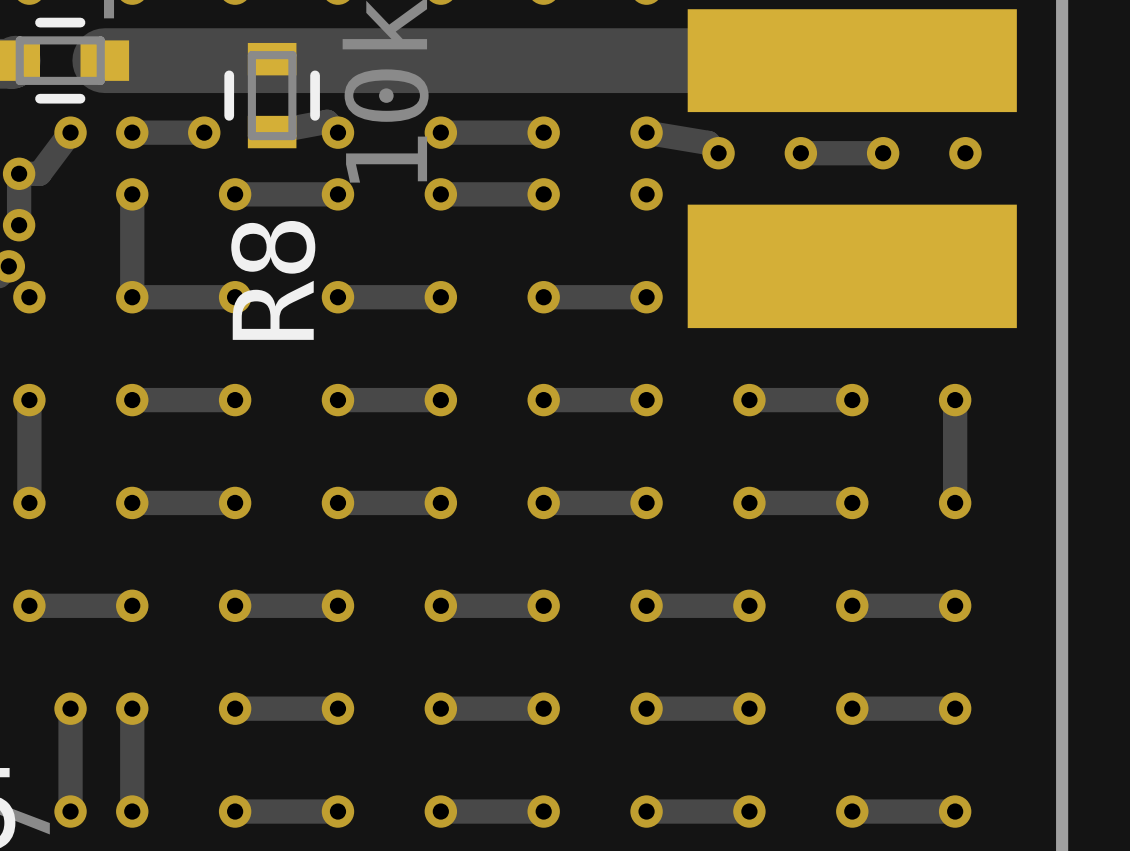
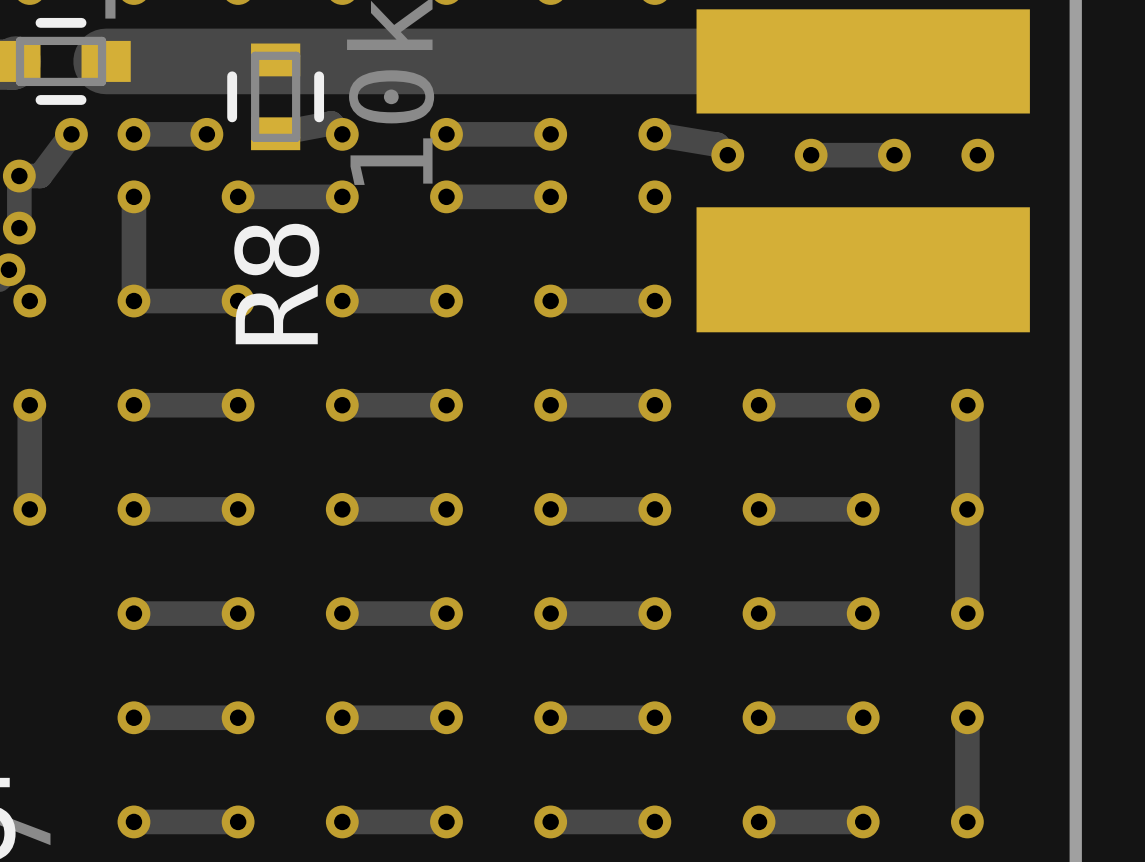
track: (29, 605) (132, 605) -> (550, 613) (654, 613)
via: (29, 605) -> none
track: (235, 605) (337, 605) -> (238, 613) (133, 613)
track: (440, 605) (543, 605) -> (446, 613) (342, 613)
track: (646, 605) (749, 605) -> (863, 613) (759, 613)
track: (852, 605) (955, 605) -> (967, 509) (967, 613)
track: (70, 708) (70, 811) -> none
via: (70, 708) -> none
track: (132, 708) (132, 811) -> (133, 717) (238, 717)
track: (235, 708) (337, 708) -> (446, 717) (342, 717)
track: (440, 708) (543, 708) -> (654, 717) (550, 717)
track: (646, 708) (749, 708) -> (863, 717) (759, 717)
track: (852, 708) (955, 708) -> (967, 821) (967, 717)
via: (70, 811) -> none
track: (235, 811) (337, 811) -> (238, 821) (133, 821)
track: (440, 811) (543, 811) -> (446, 821) (342, 821)
track: (646, 811) (749, 811) -> (863, 821) (759, 821)
track: (852, 811) (955, 811) -> (550, 821) (654, 821)

